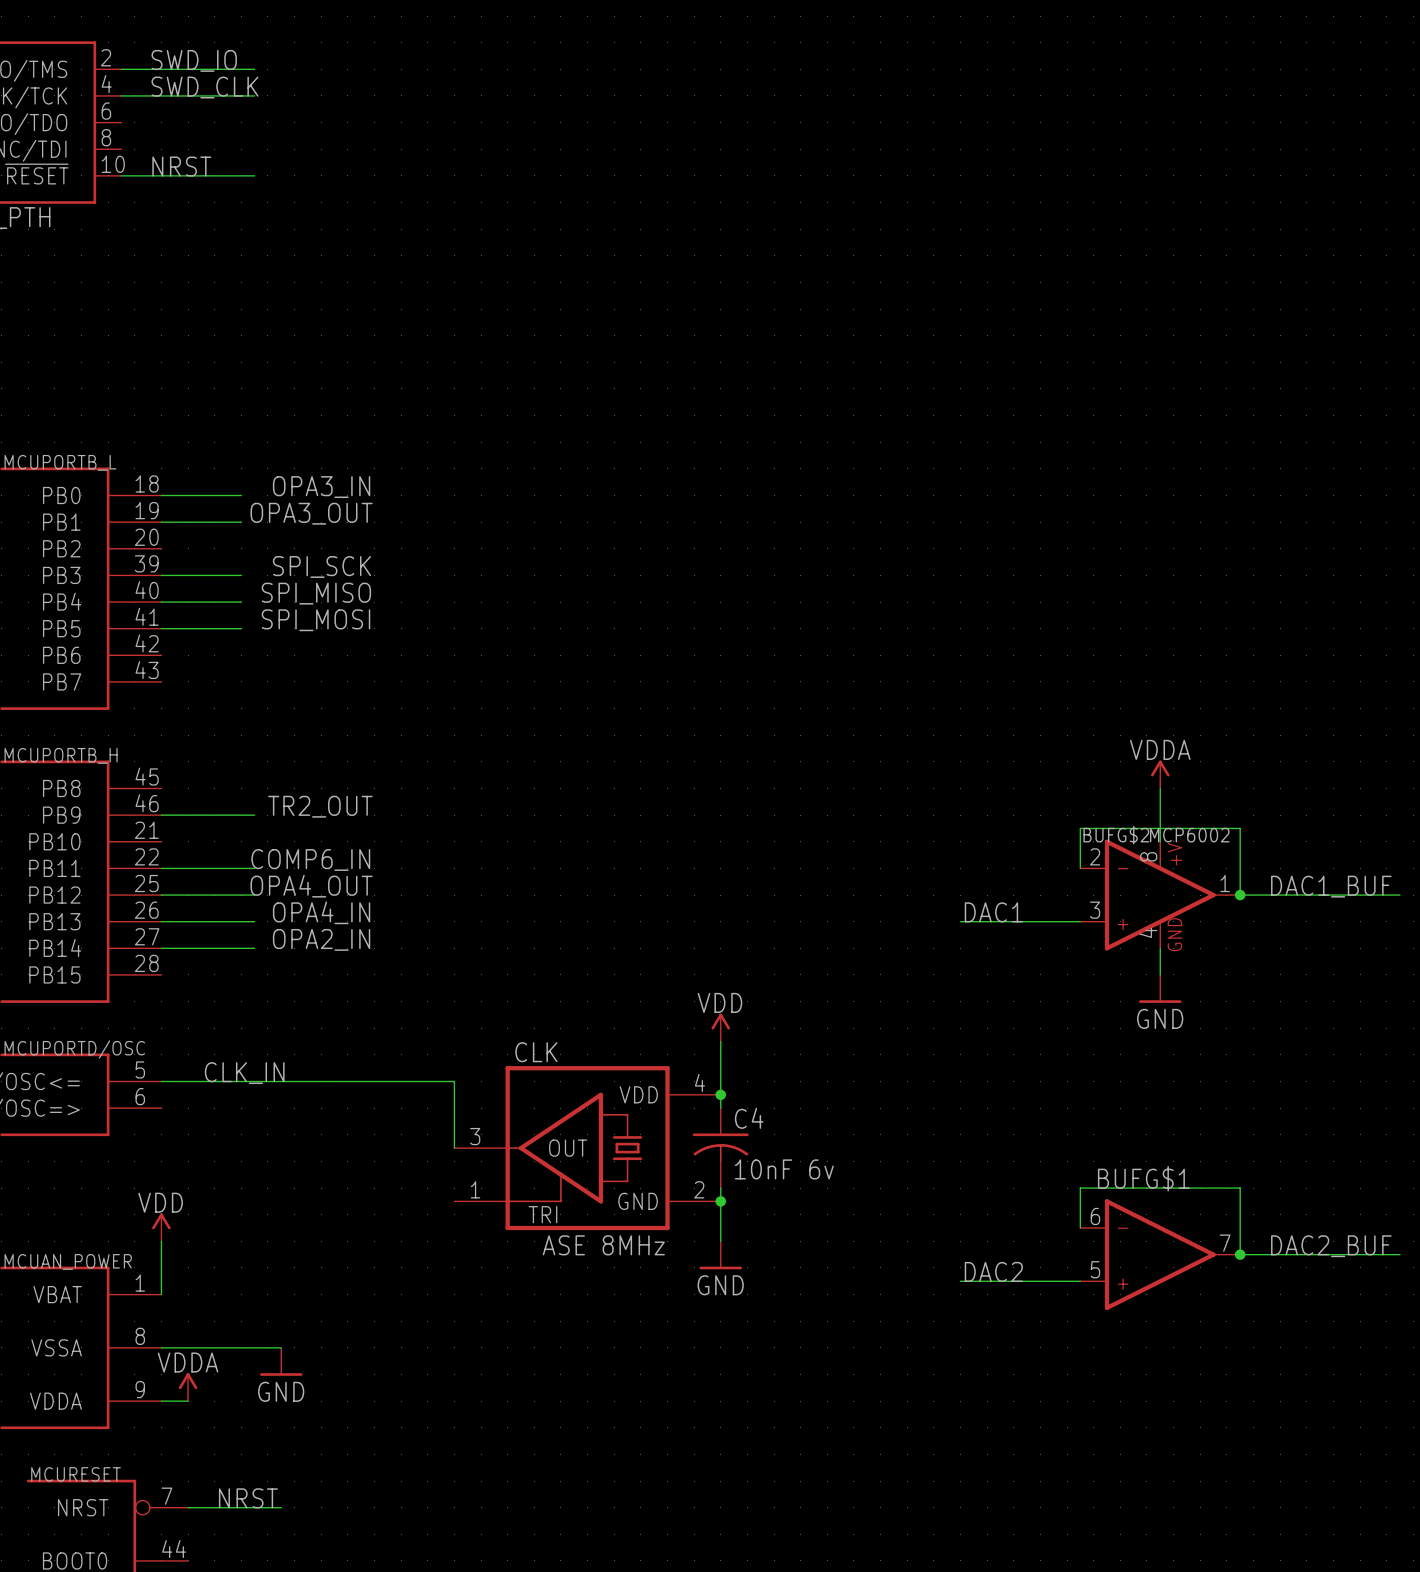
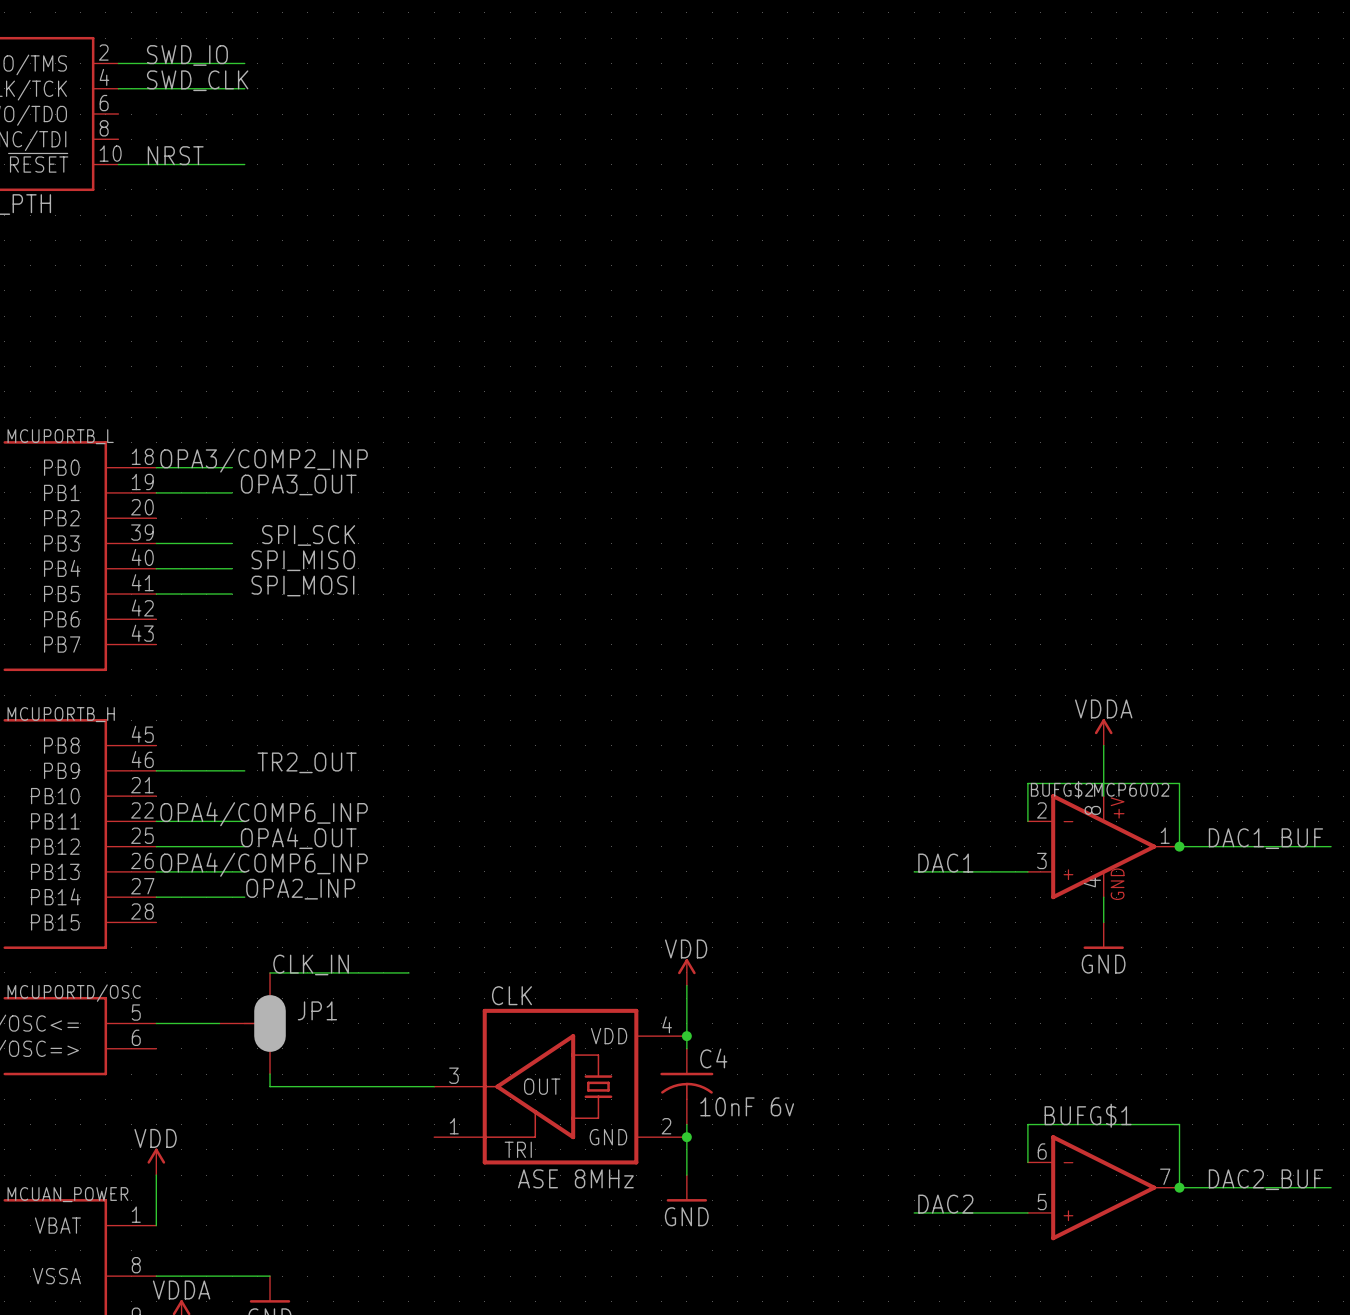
label: OPA3_IN (321, 487) -> OPA3/COMP2_INP (264, 460)
label: COMP6_IN (310, 859) -> OPA4/COMP6_INP (264, 814)
label: OPA4_IN (321, 912) -> OPA4/COMP6_INP (264, 864)
label: OPA2_IN (321, 939) -> OPA2_INP (300, 889)
wire: none -> (270, 972) (408, 972)
label position: CLK_IN (244, 1073) -> CLK_IN (311, 964)
wire: (227, 1081) (454, 1081) (454, 1148) -> (270, 1074) (270, 1086) (434, 1086)
JP1: none -> (252, 1023)

